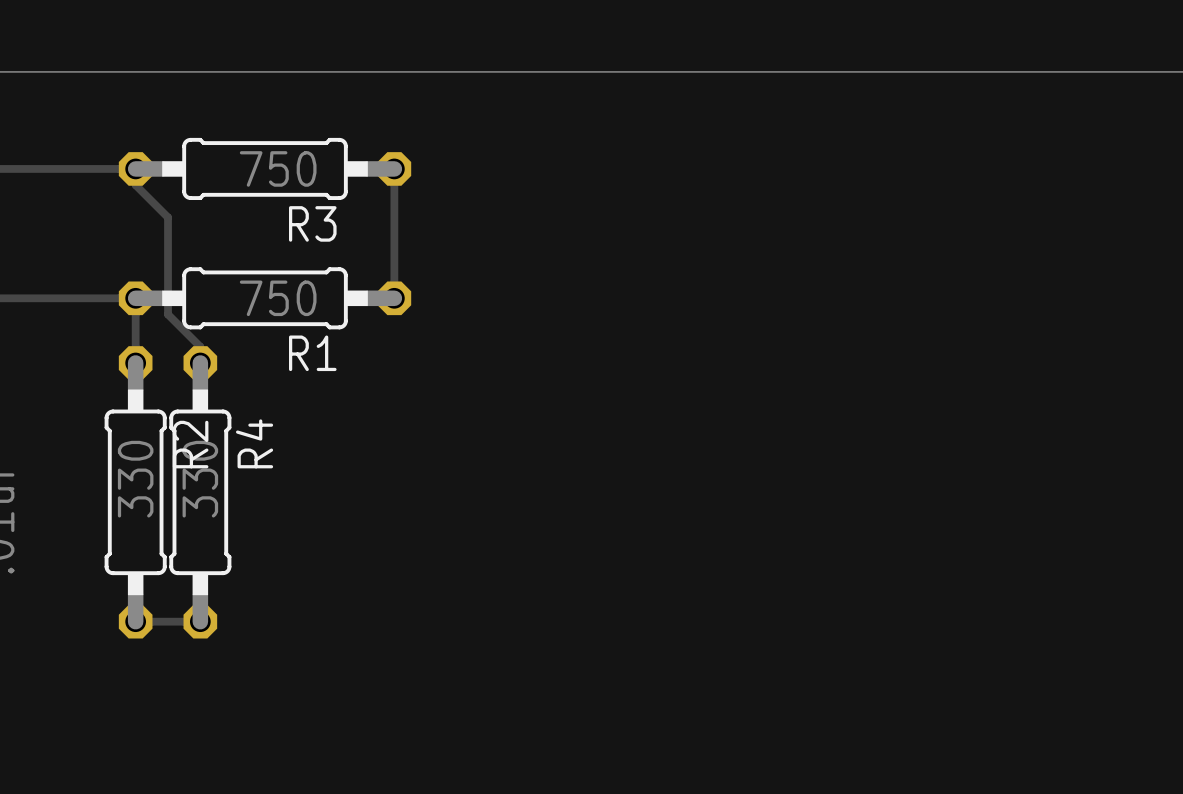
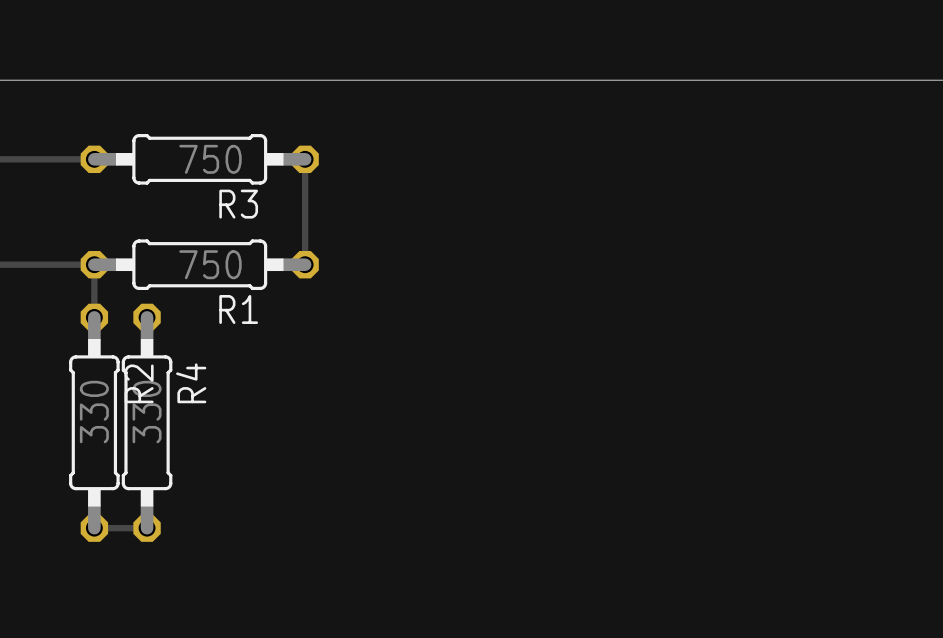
track: (135, 168) (135, 185) (168, 217) (168, 314) (200, 346) (200, 362) -> none

